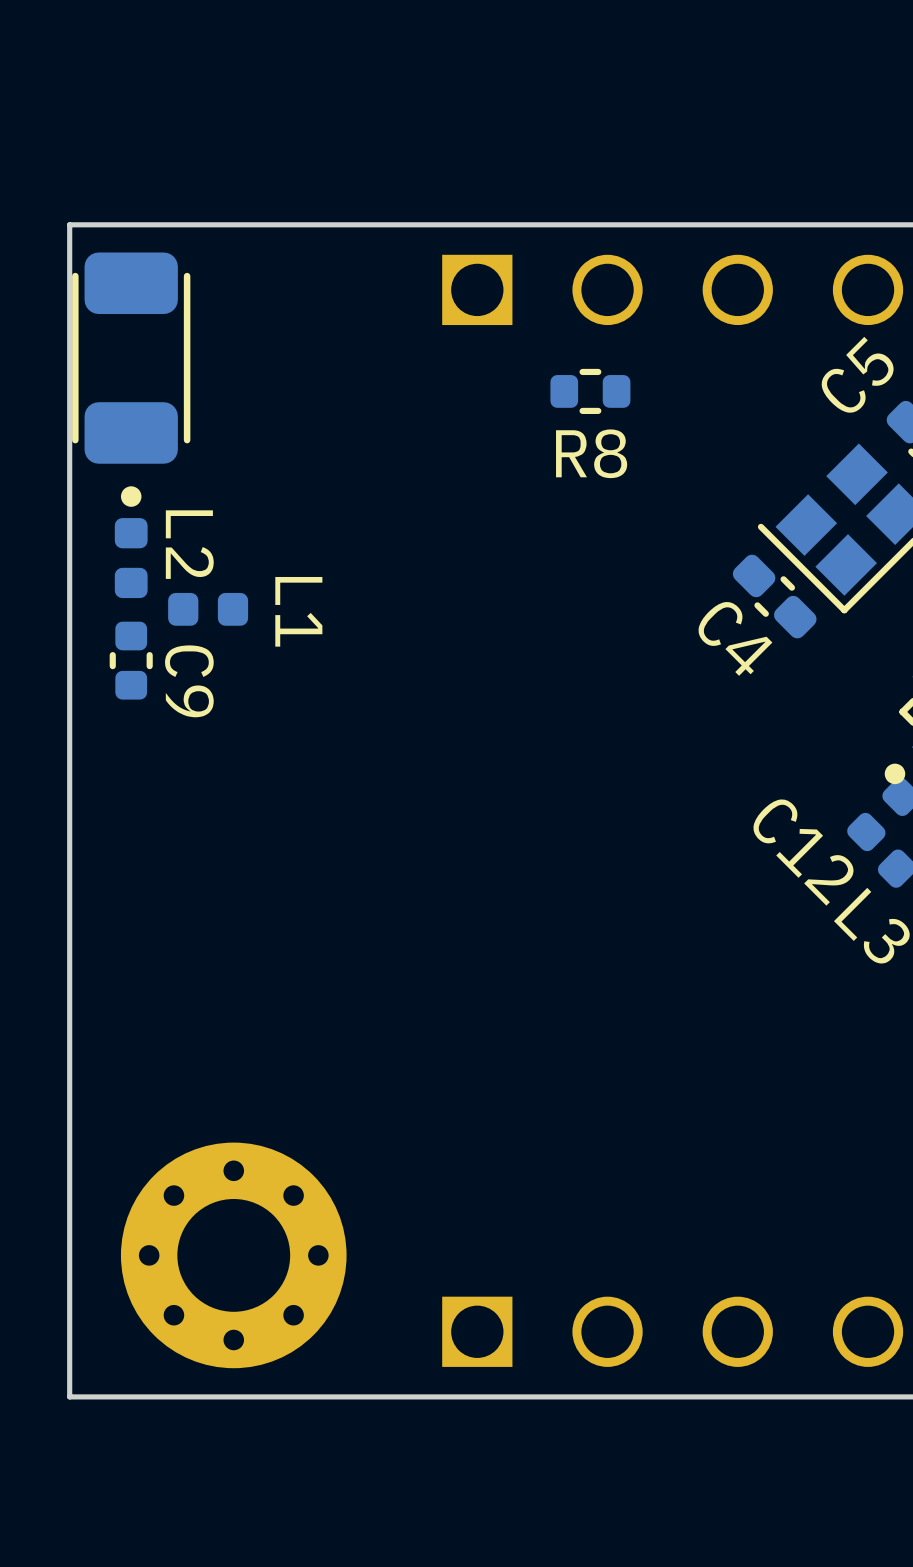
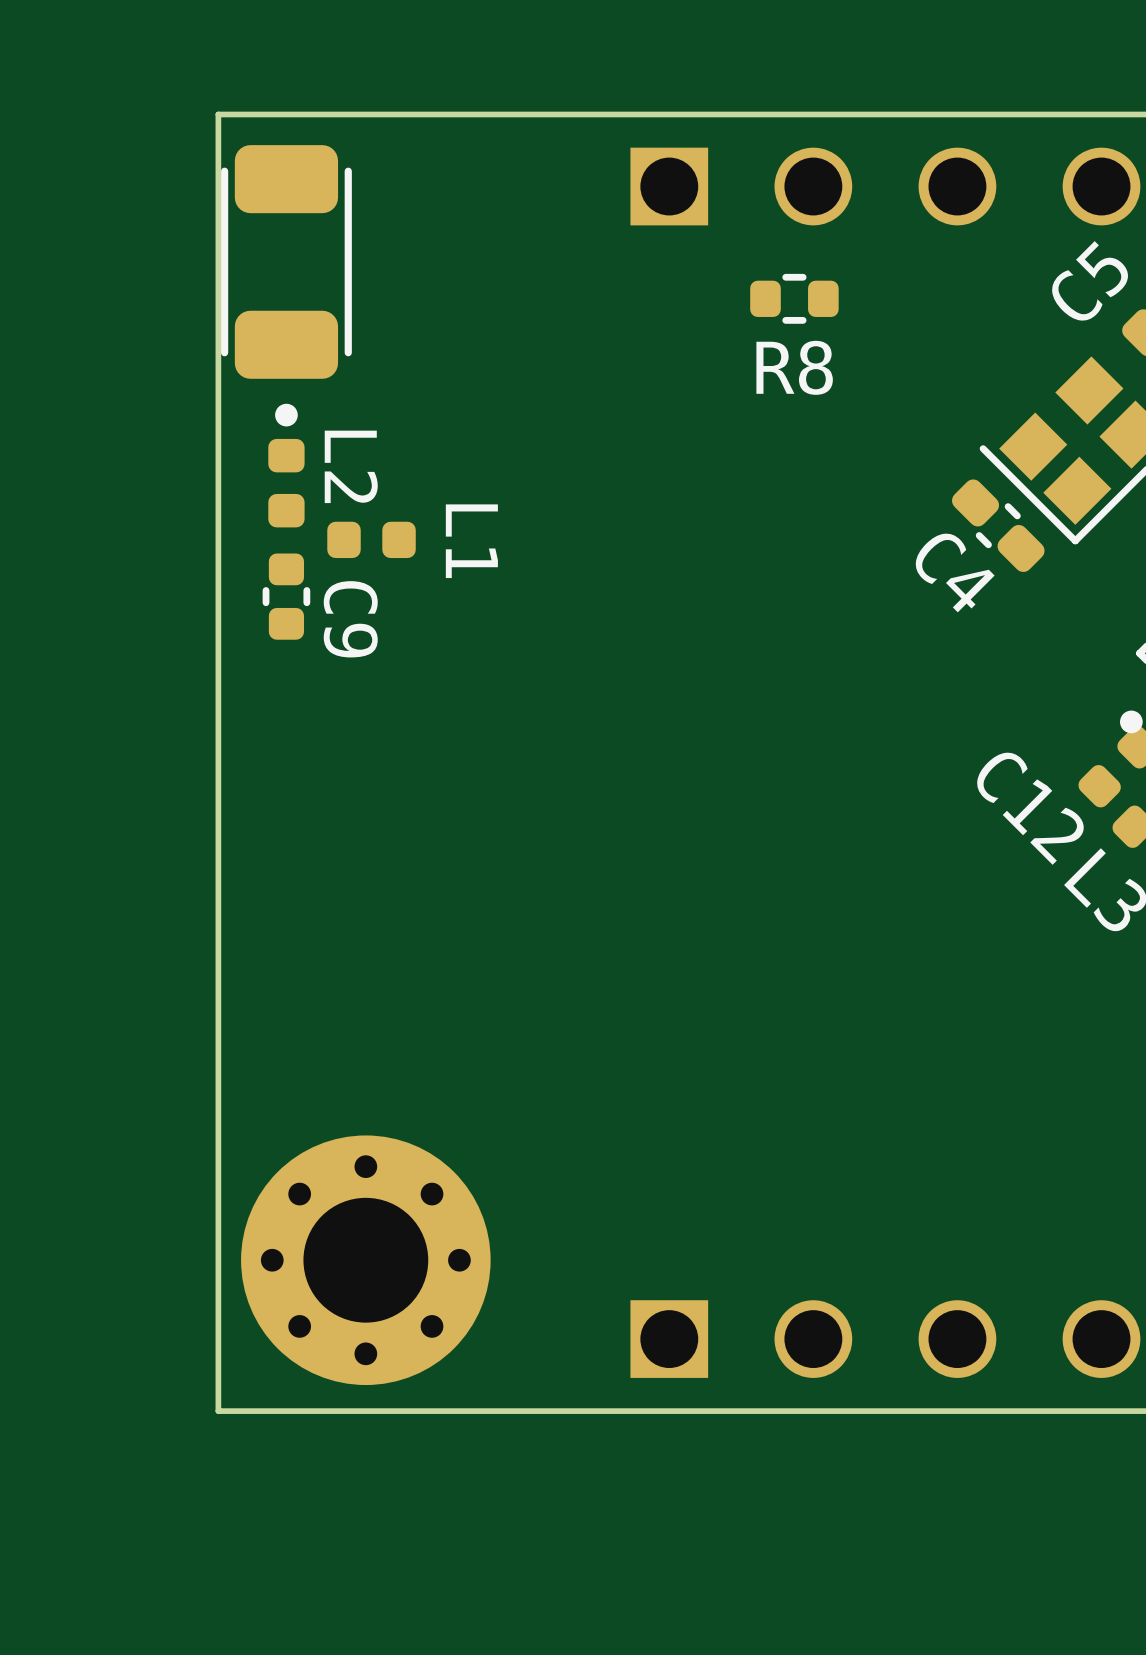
part position: (233, 1255) -> (365, 1260)

